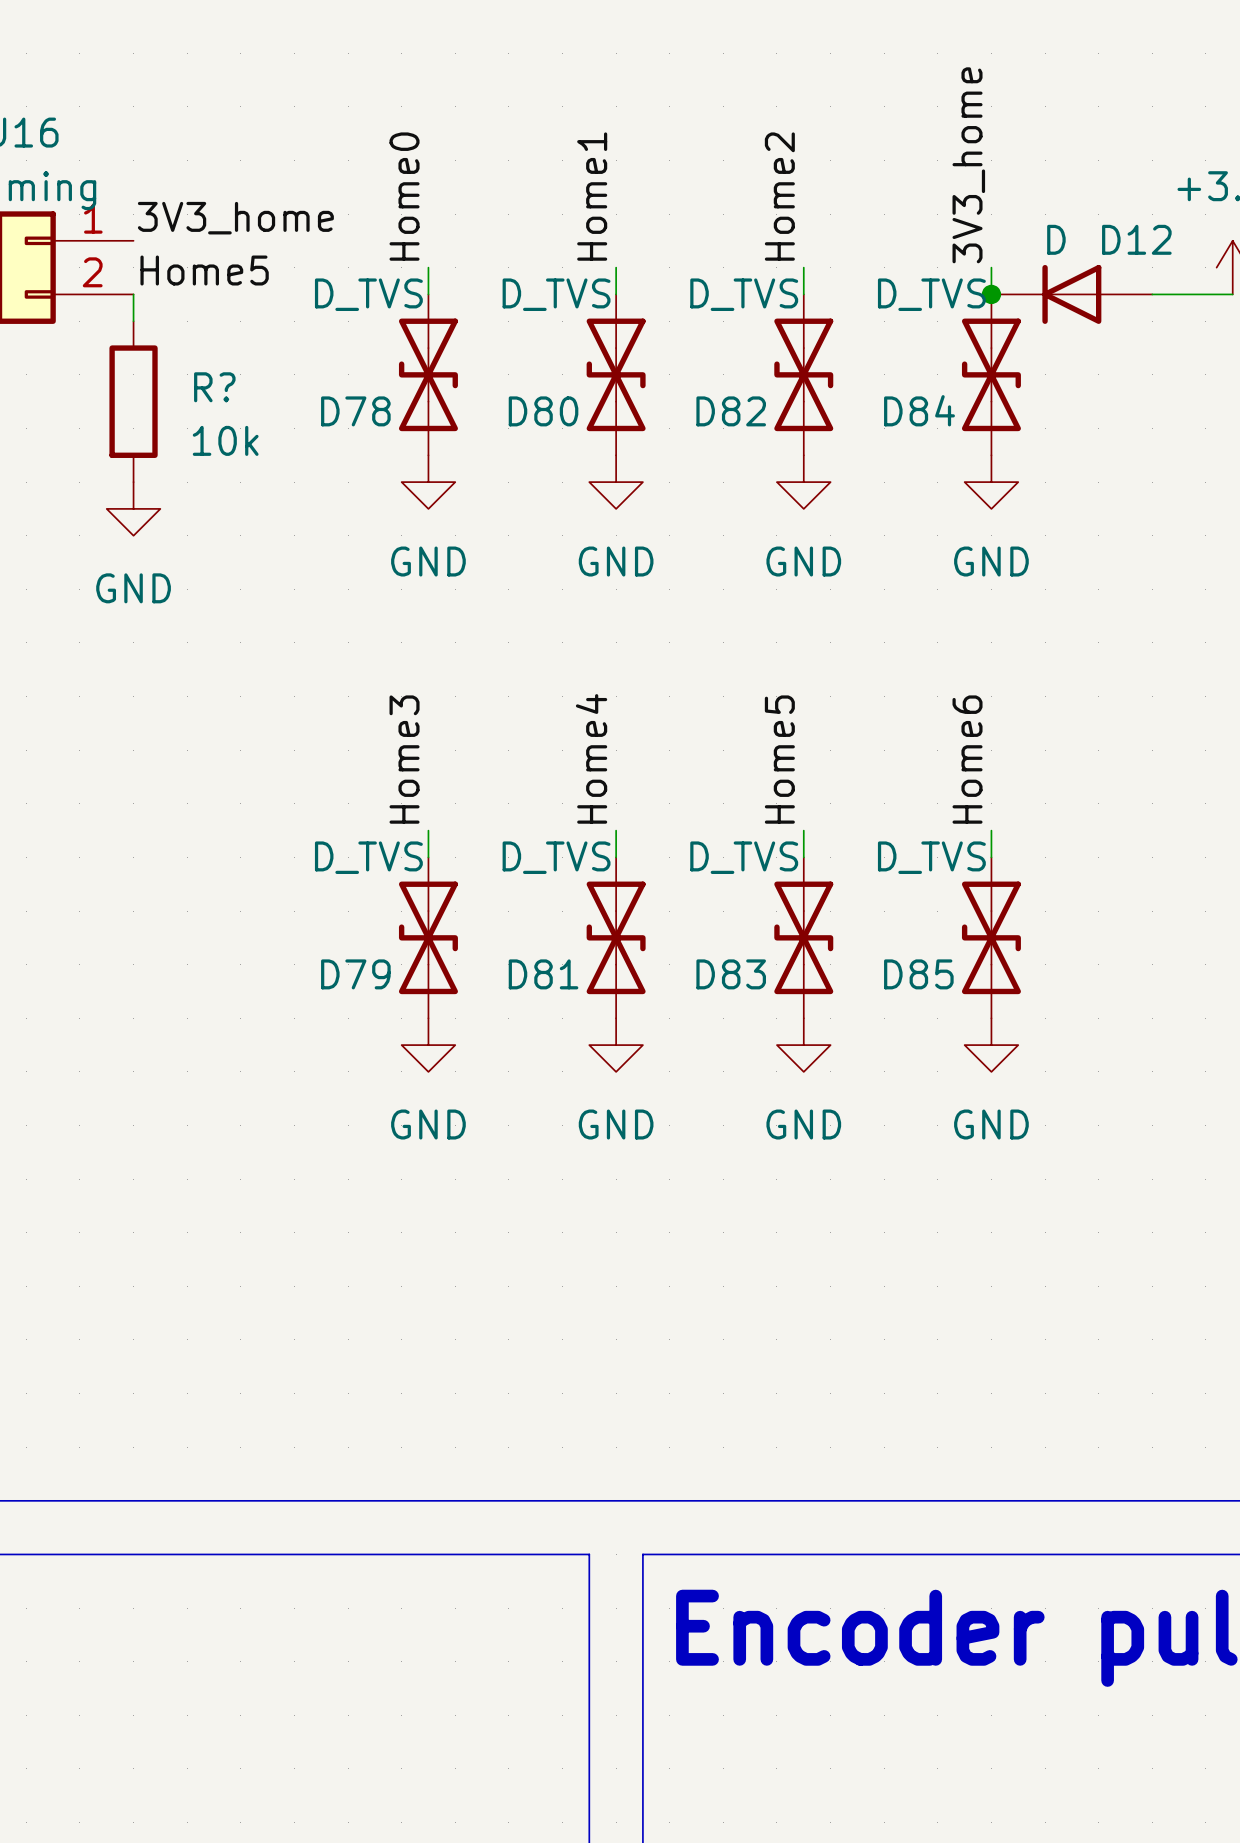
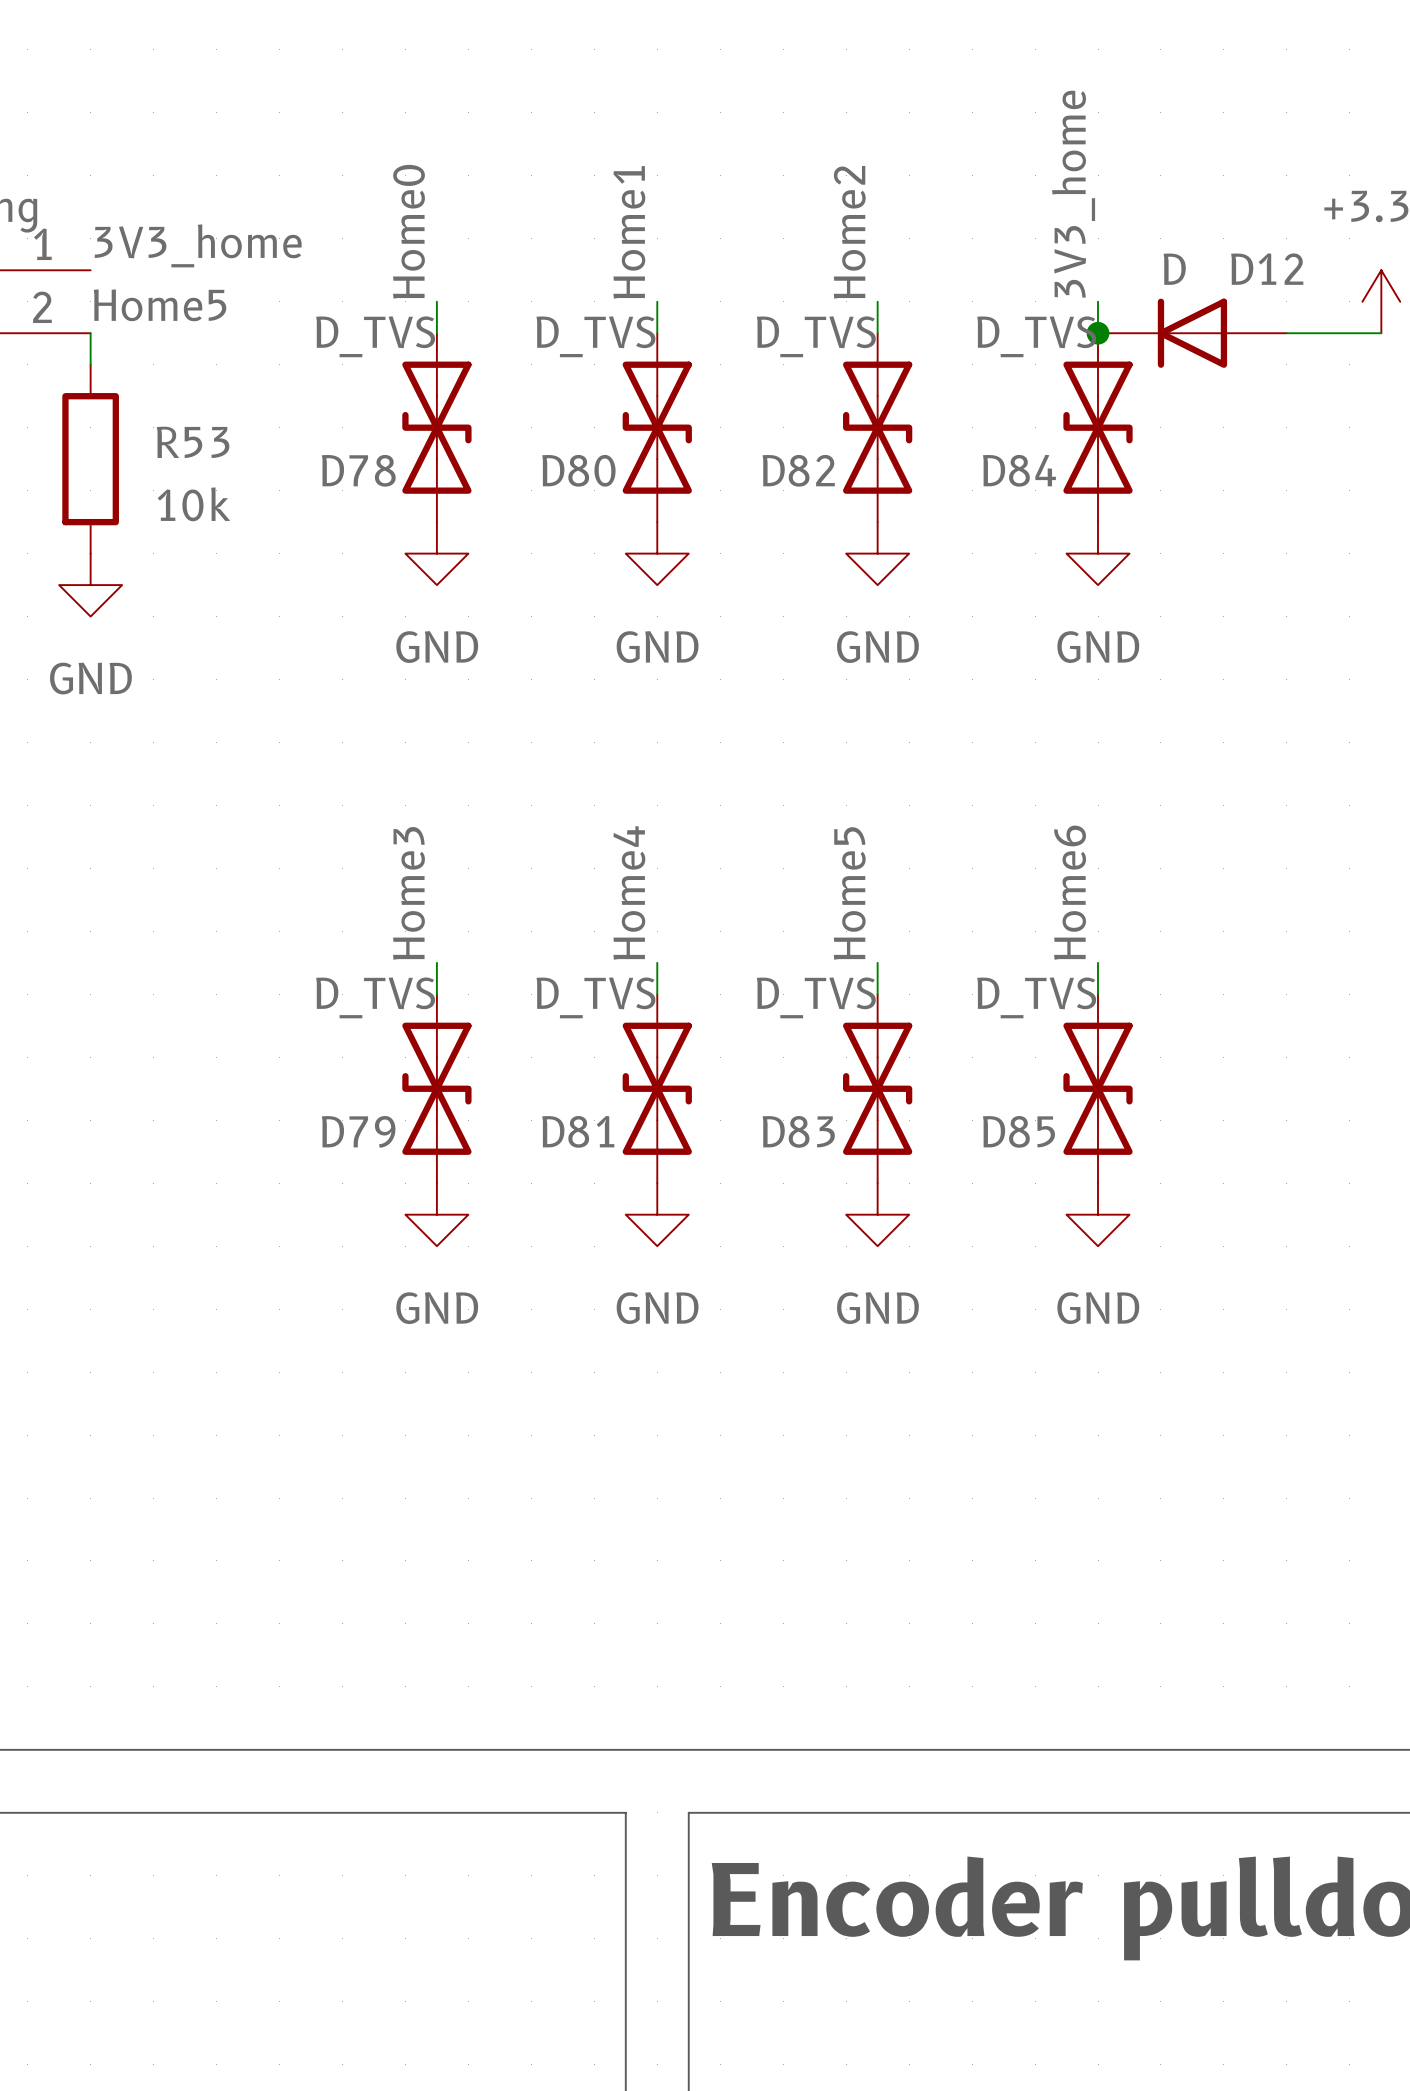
R? name: R? (214, 387) -> R53 (193, 442)

